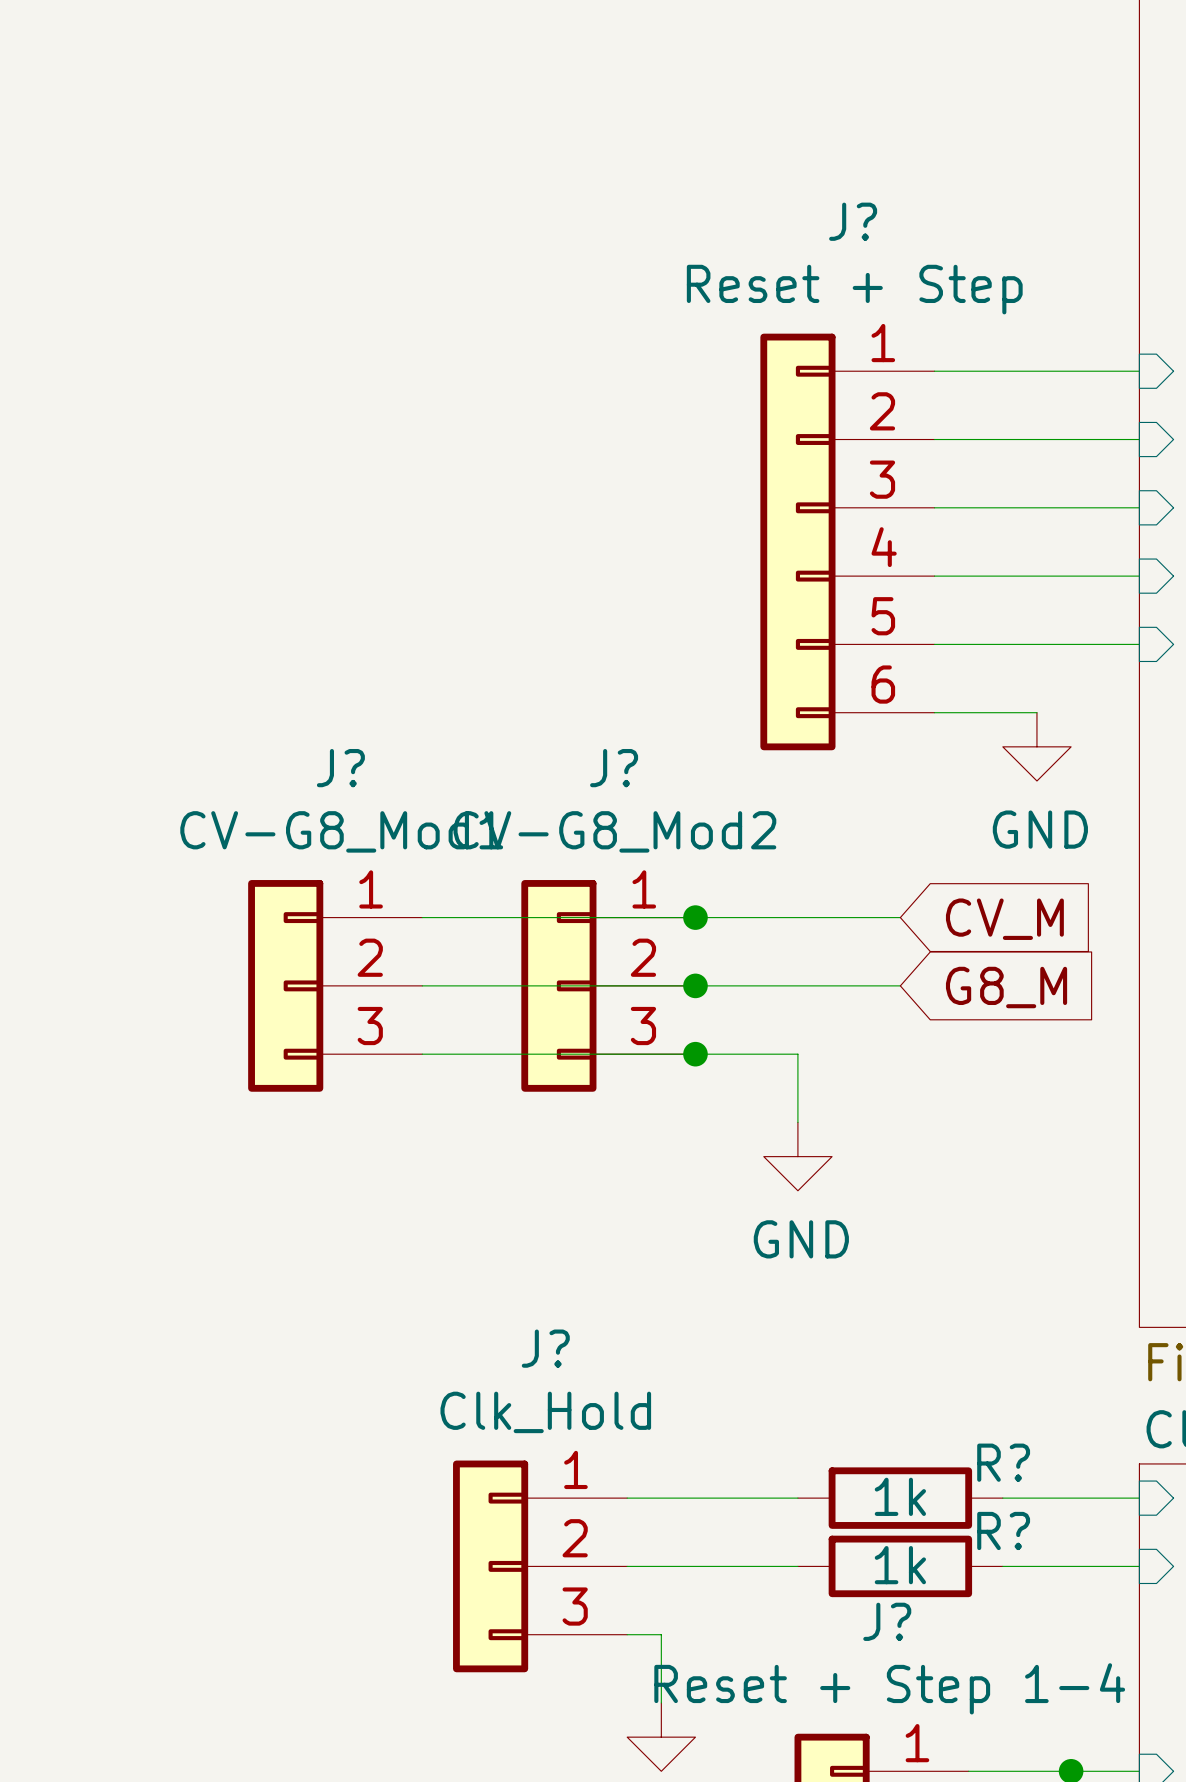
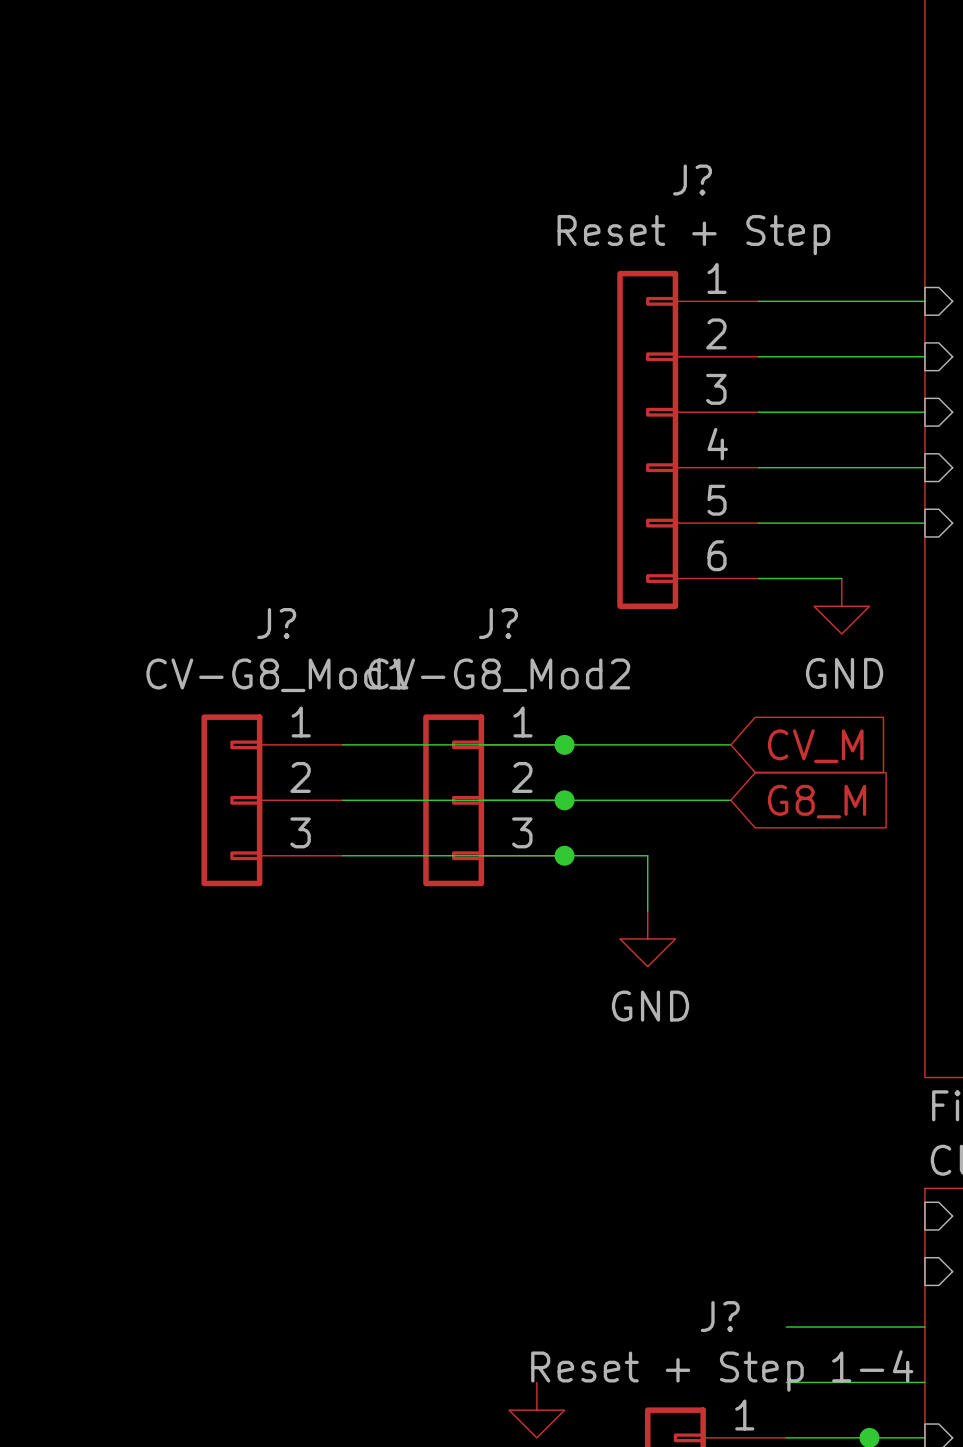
wire: (627, 1498) (797, 1498) -> (786, 1327) (924, 1327)
R?: 1k (900, 1498) -> none
wire: (1002, 1498) (1139, 1498) -> none
J?: Clk_Hold (540, 1566) -> none
wire: (627, 1566) (797, 1566) -> (786, 1382) (924, 1382)
R?: 1k (900, 1566) -> none
wire: (1002, 1566) (1139, 1566) -> none
wire: (627, 1634) (661, 1634) (661, 1703) -> none

